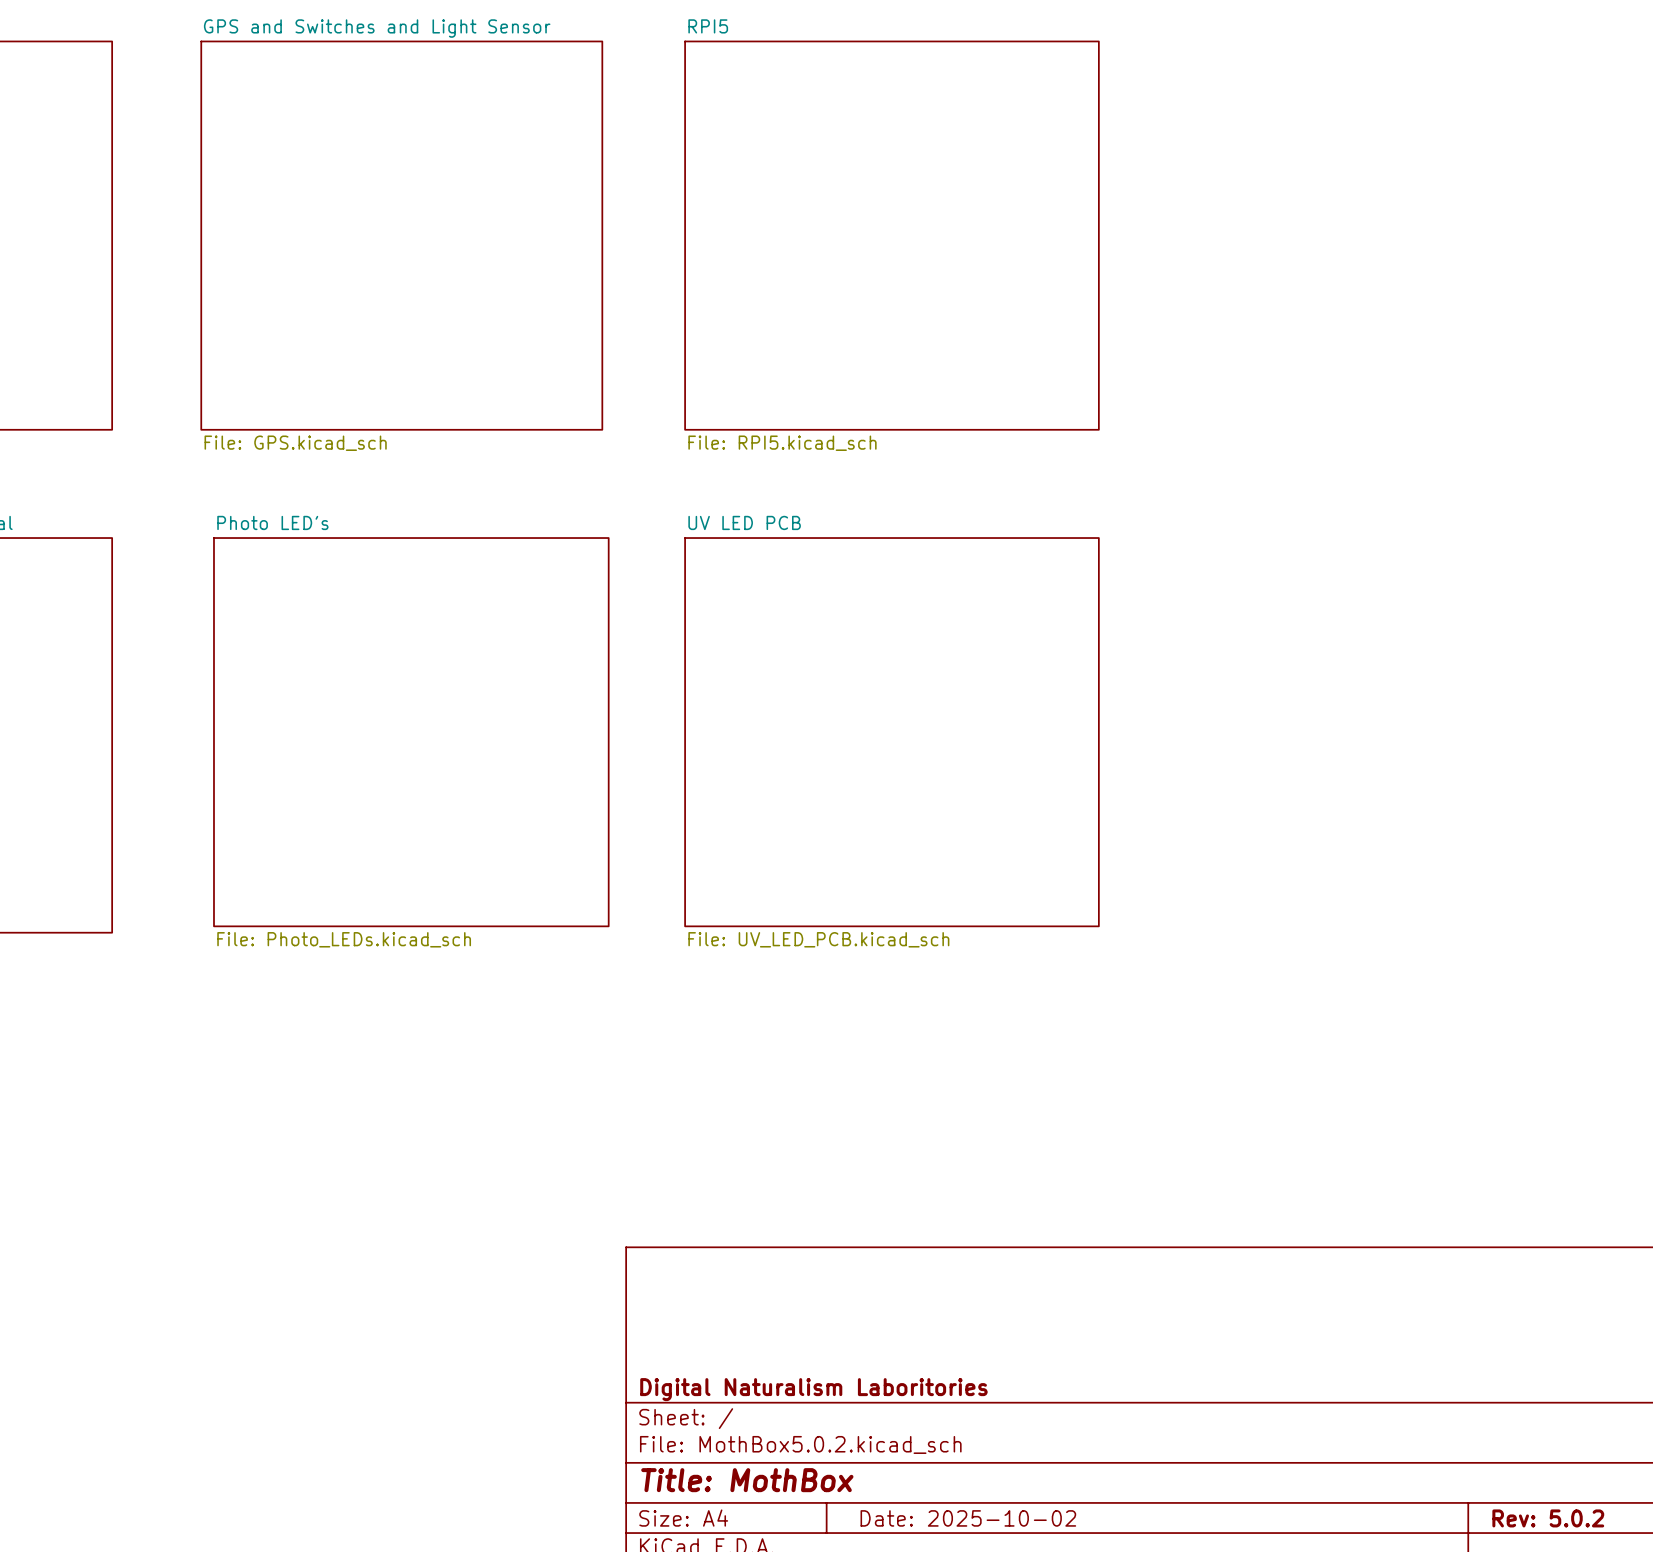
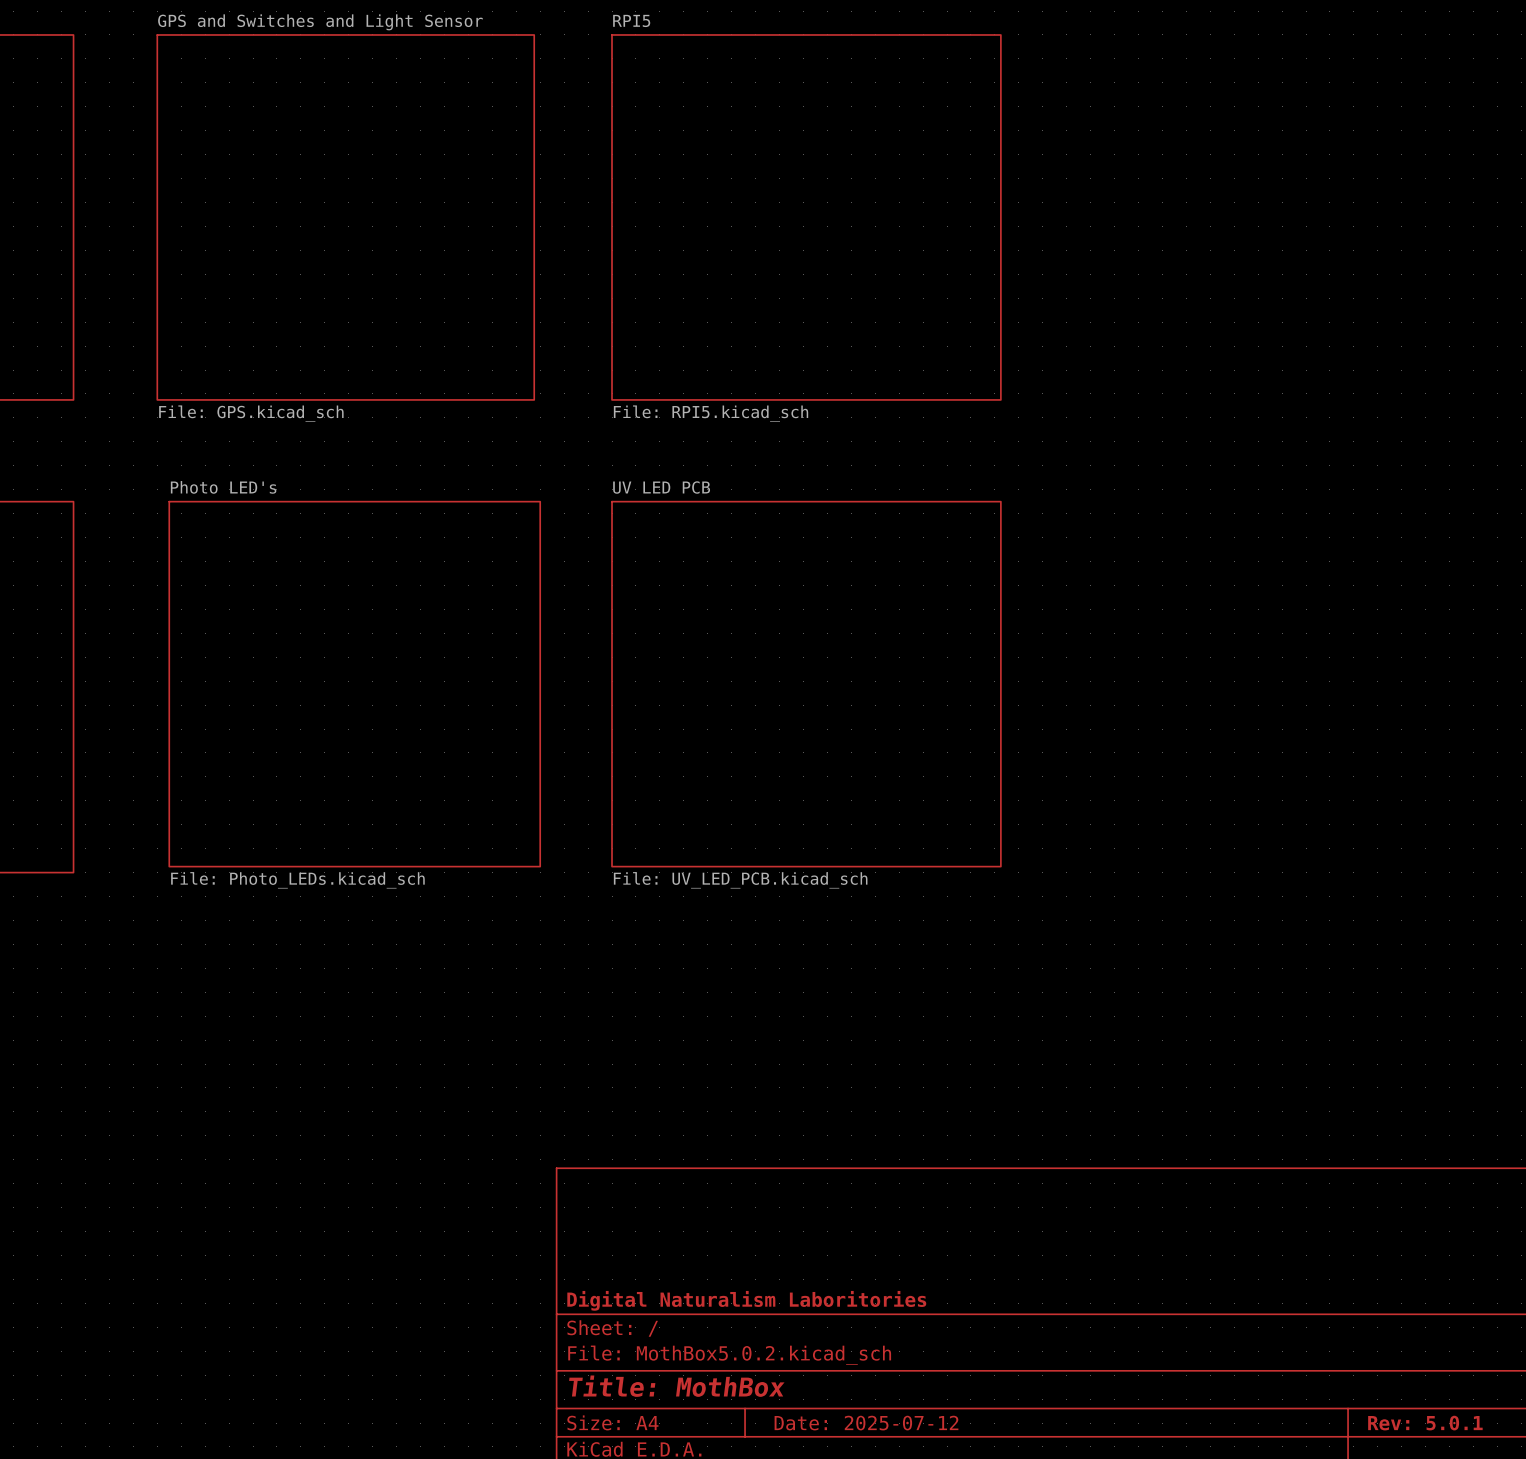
title block: Date: 2025-10-02 (968, 1518) -> Date: 2025-07-12 (866, 1423)
title block: Rev: 5.0.2 (1548, 1518) -> Rev: 5.0.1 (1425, 1423)

